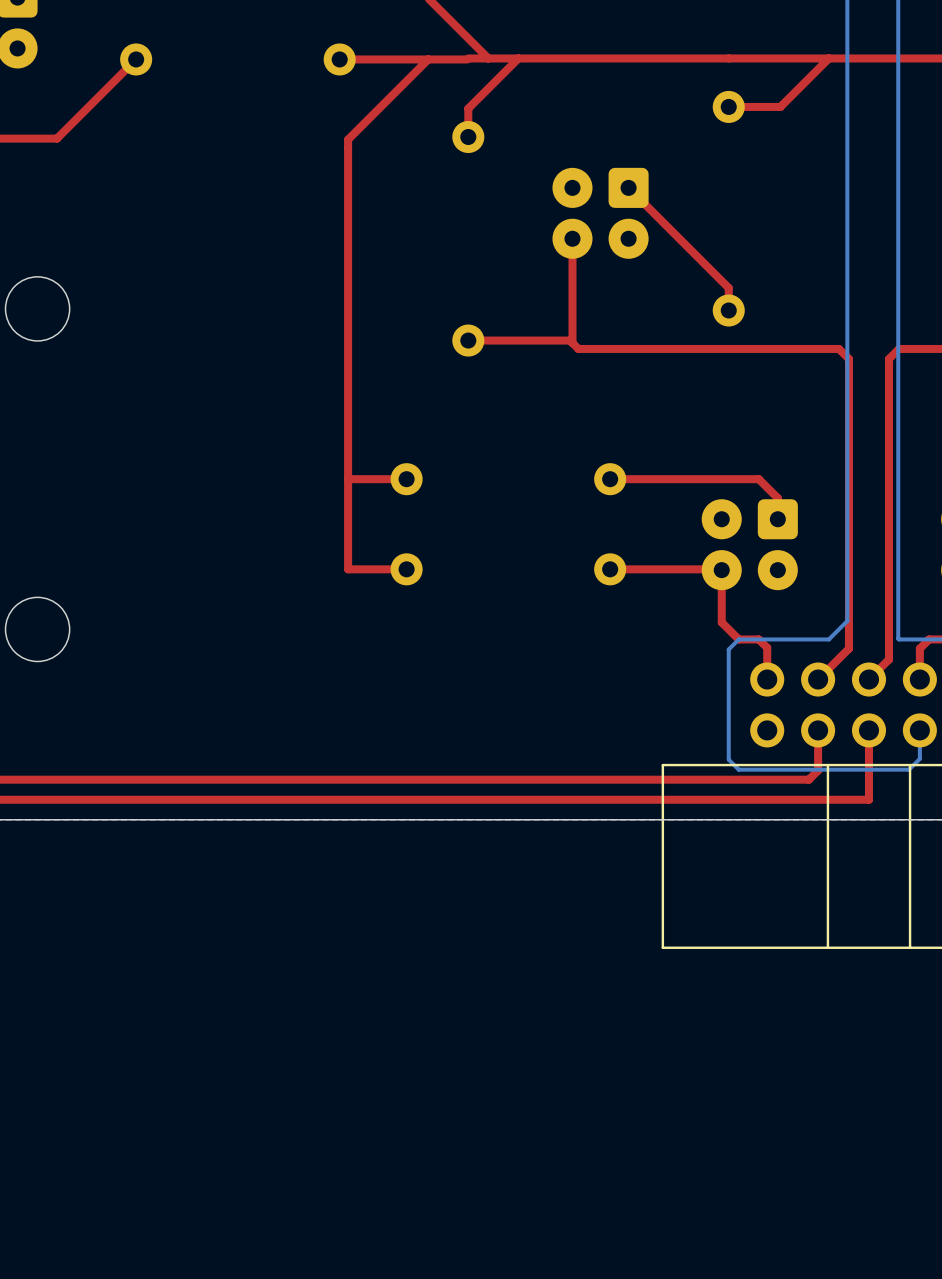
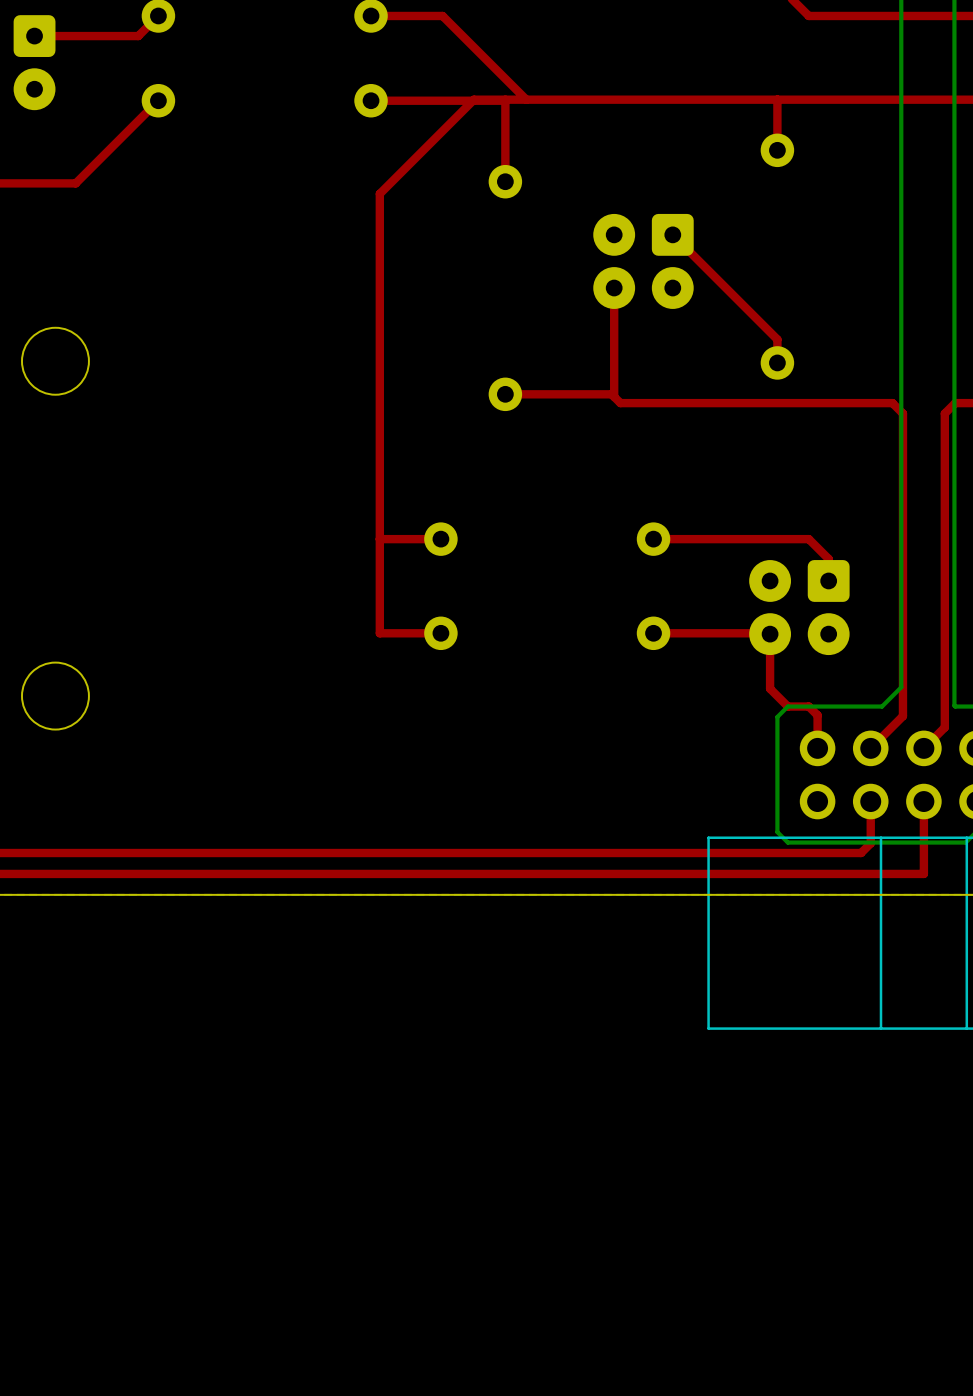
top track: (518, 58) (468, 108) -> none
top track: (828, 58) (780, 106) (728, 106) -> (777, 99) (777, 150)
top track: (428, 59) (348, 139) (348, 148) -> (505, 152) (505, 99) (473, 99) (379, 193)

